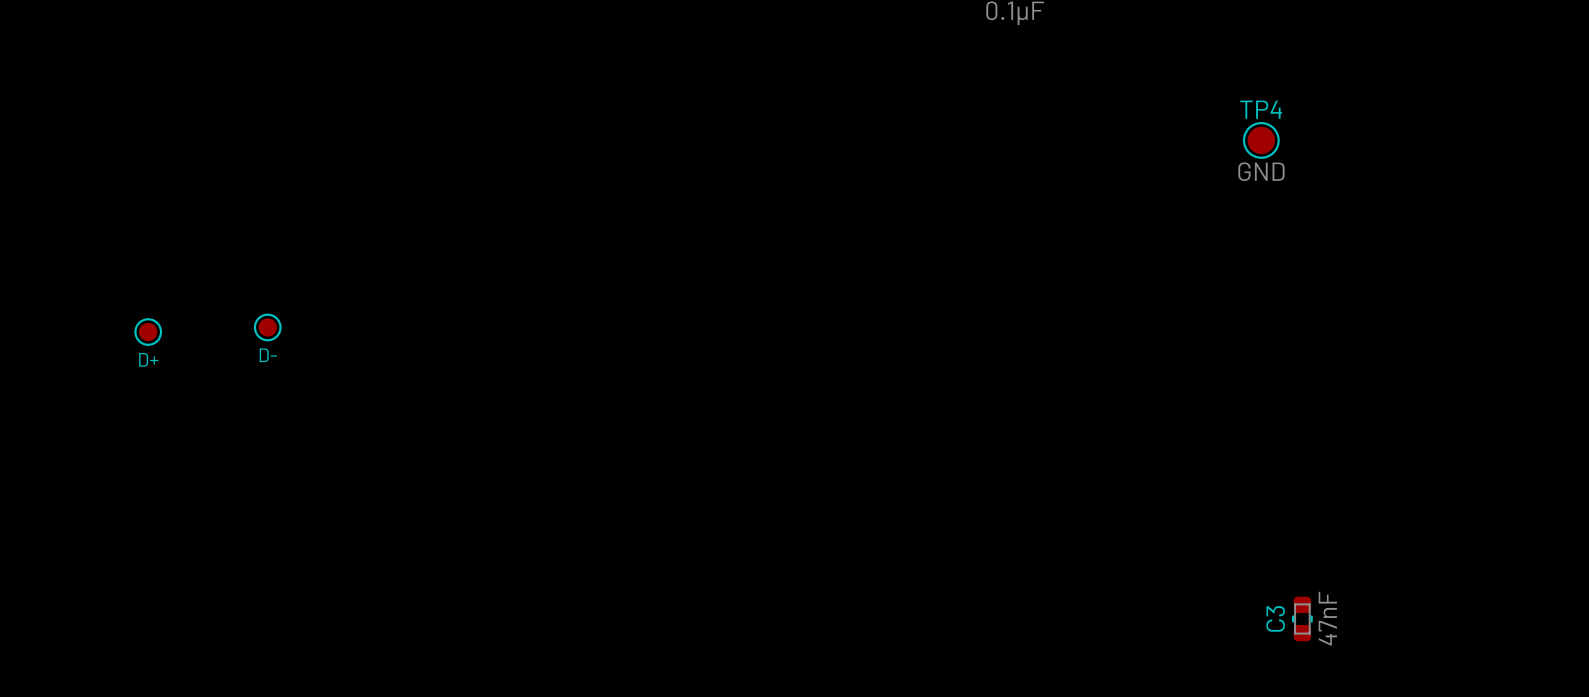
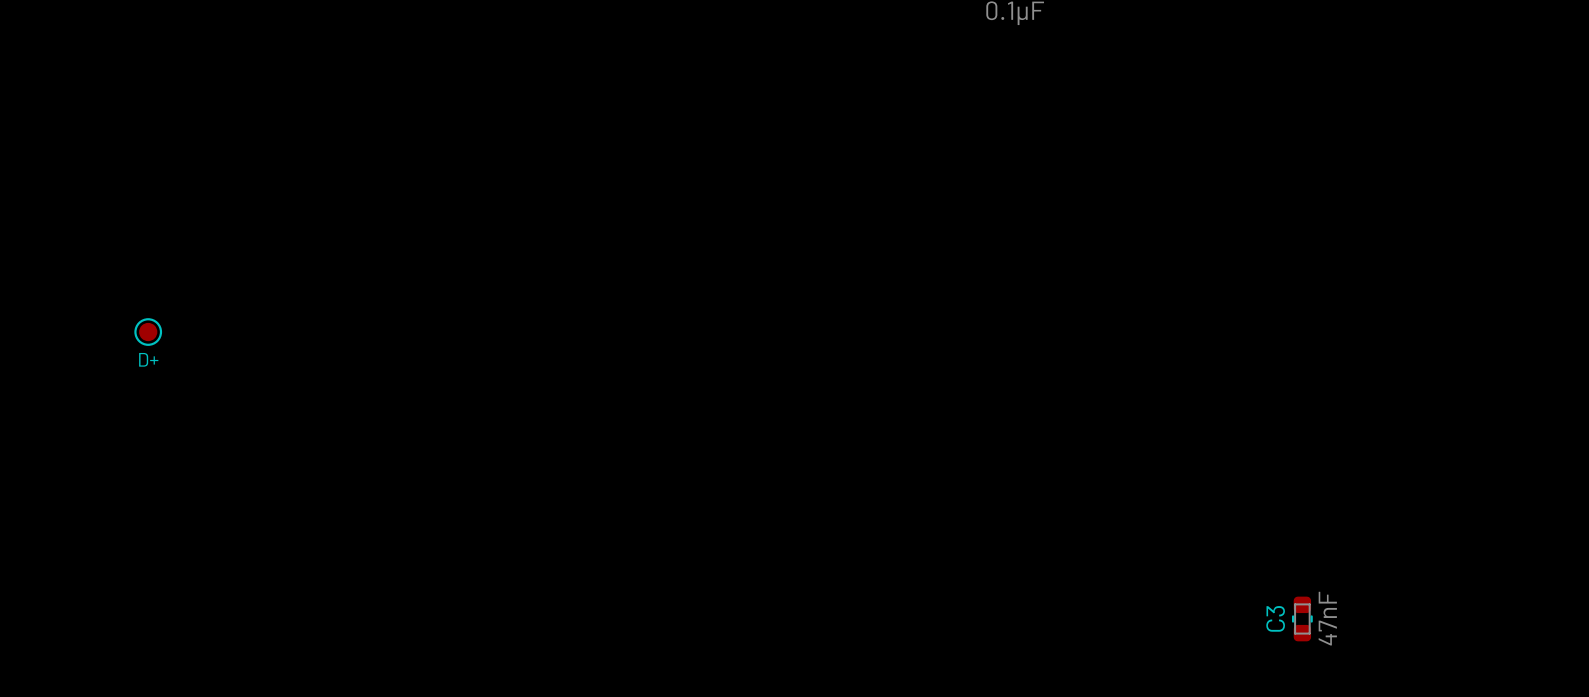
TP4: GND (1261, 140) -> none
part: D- (267, 327) -> none

